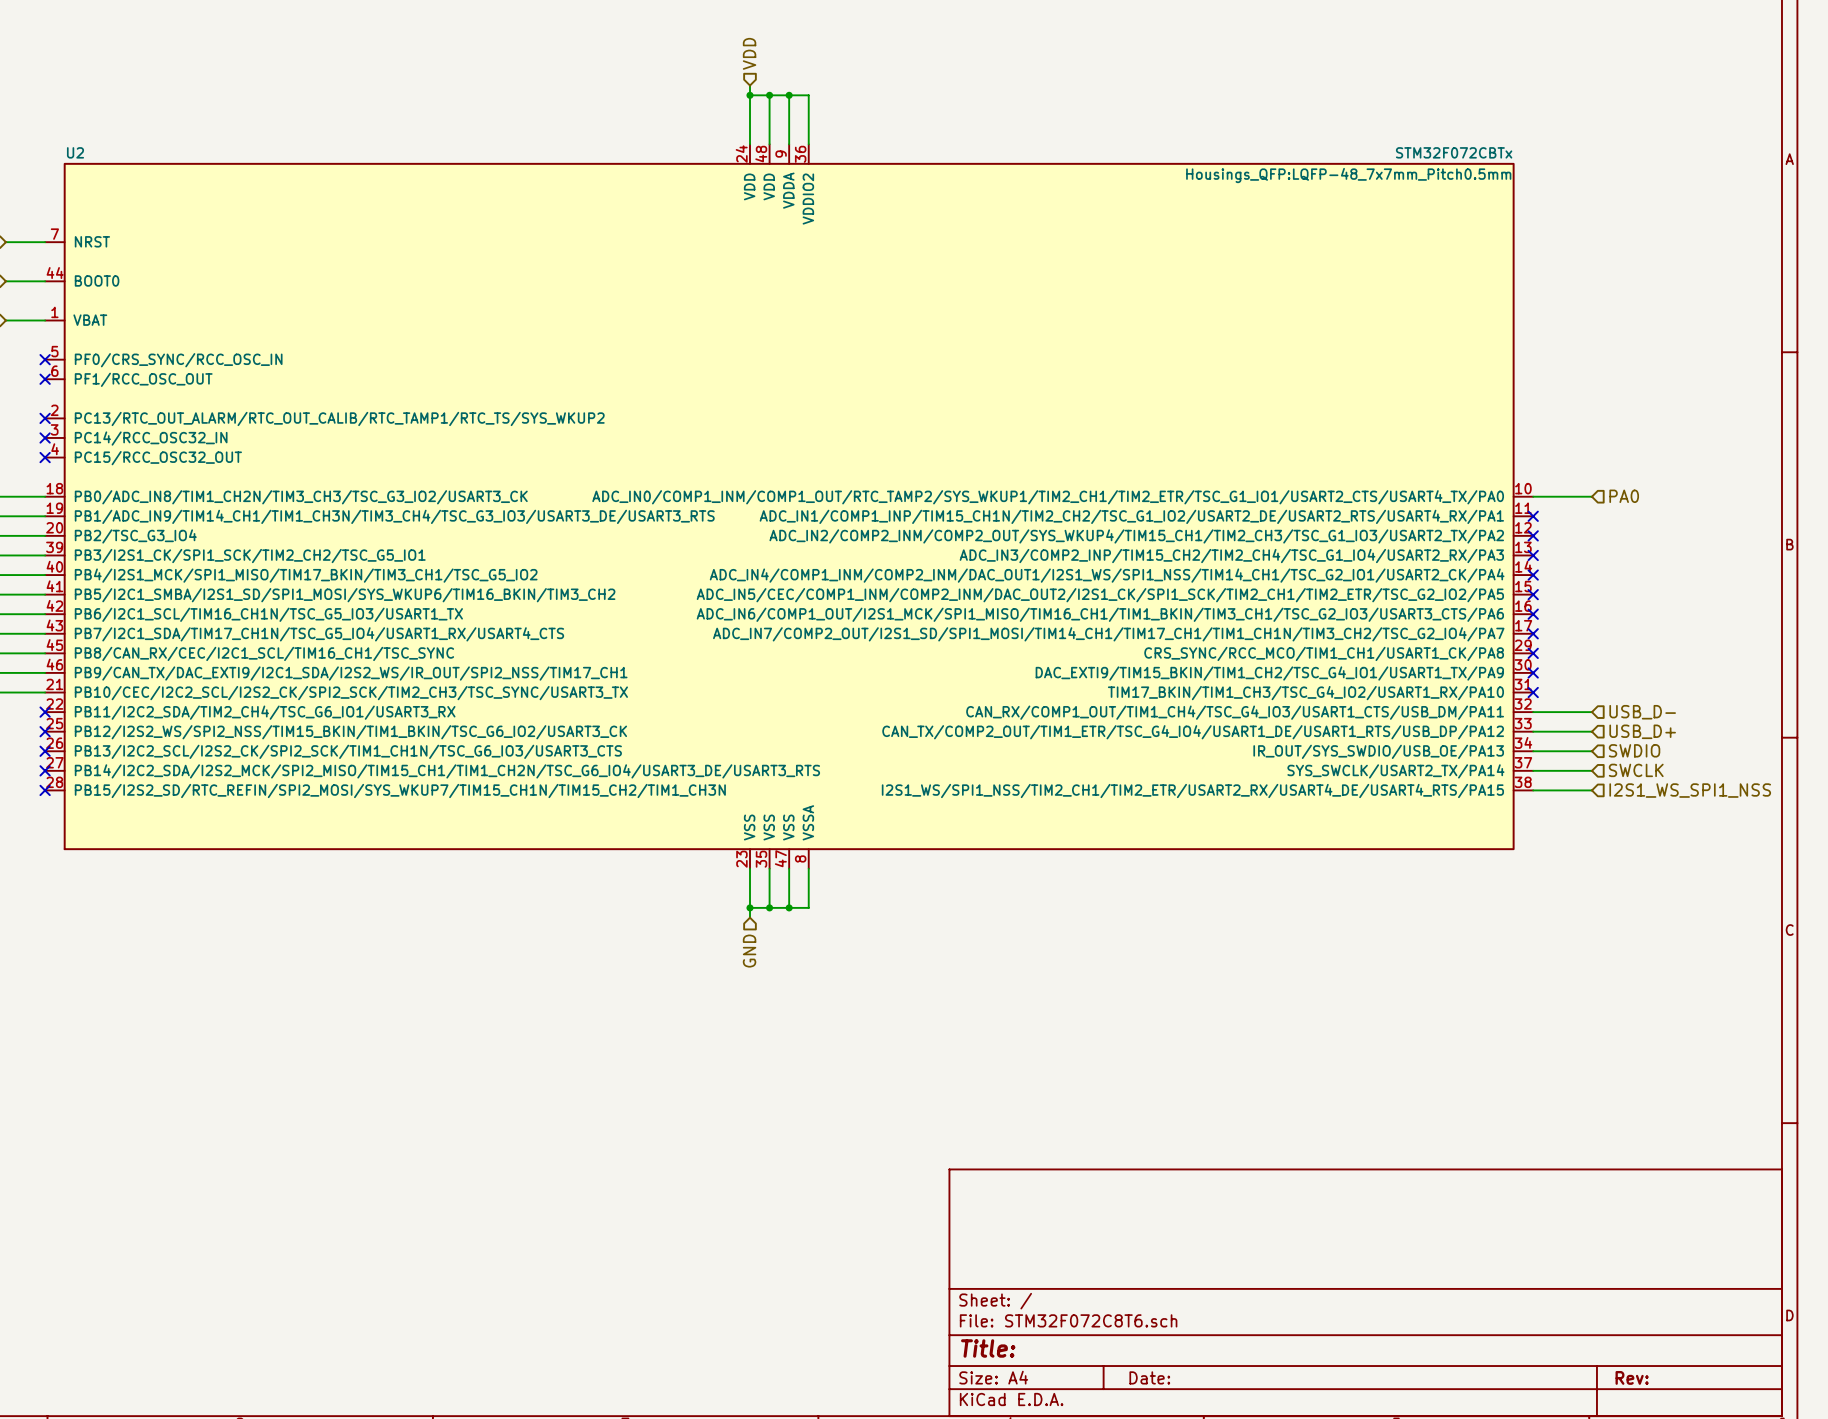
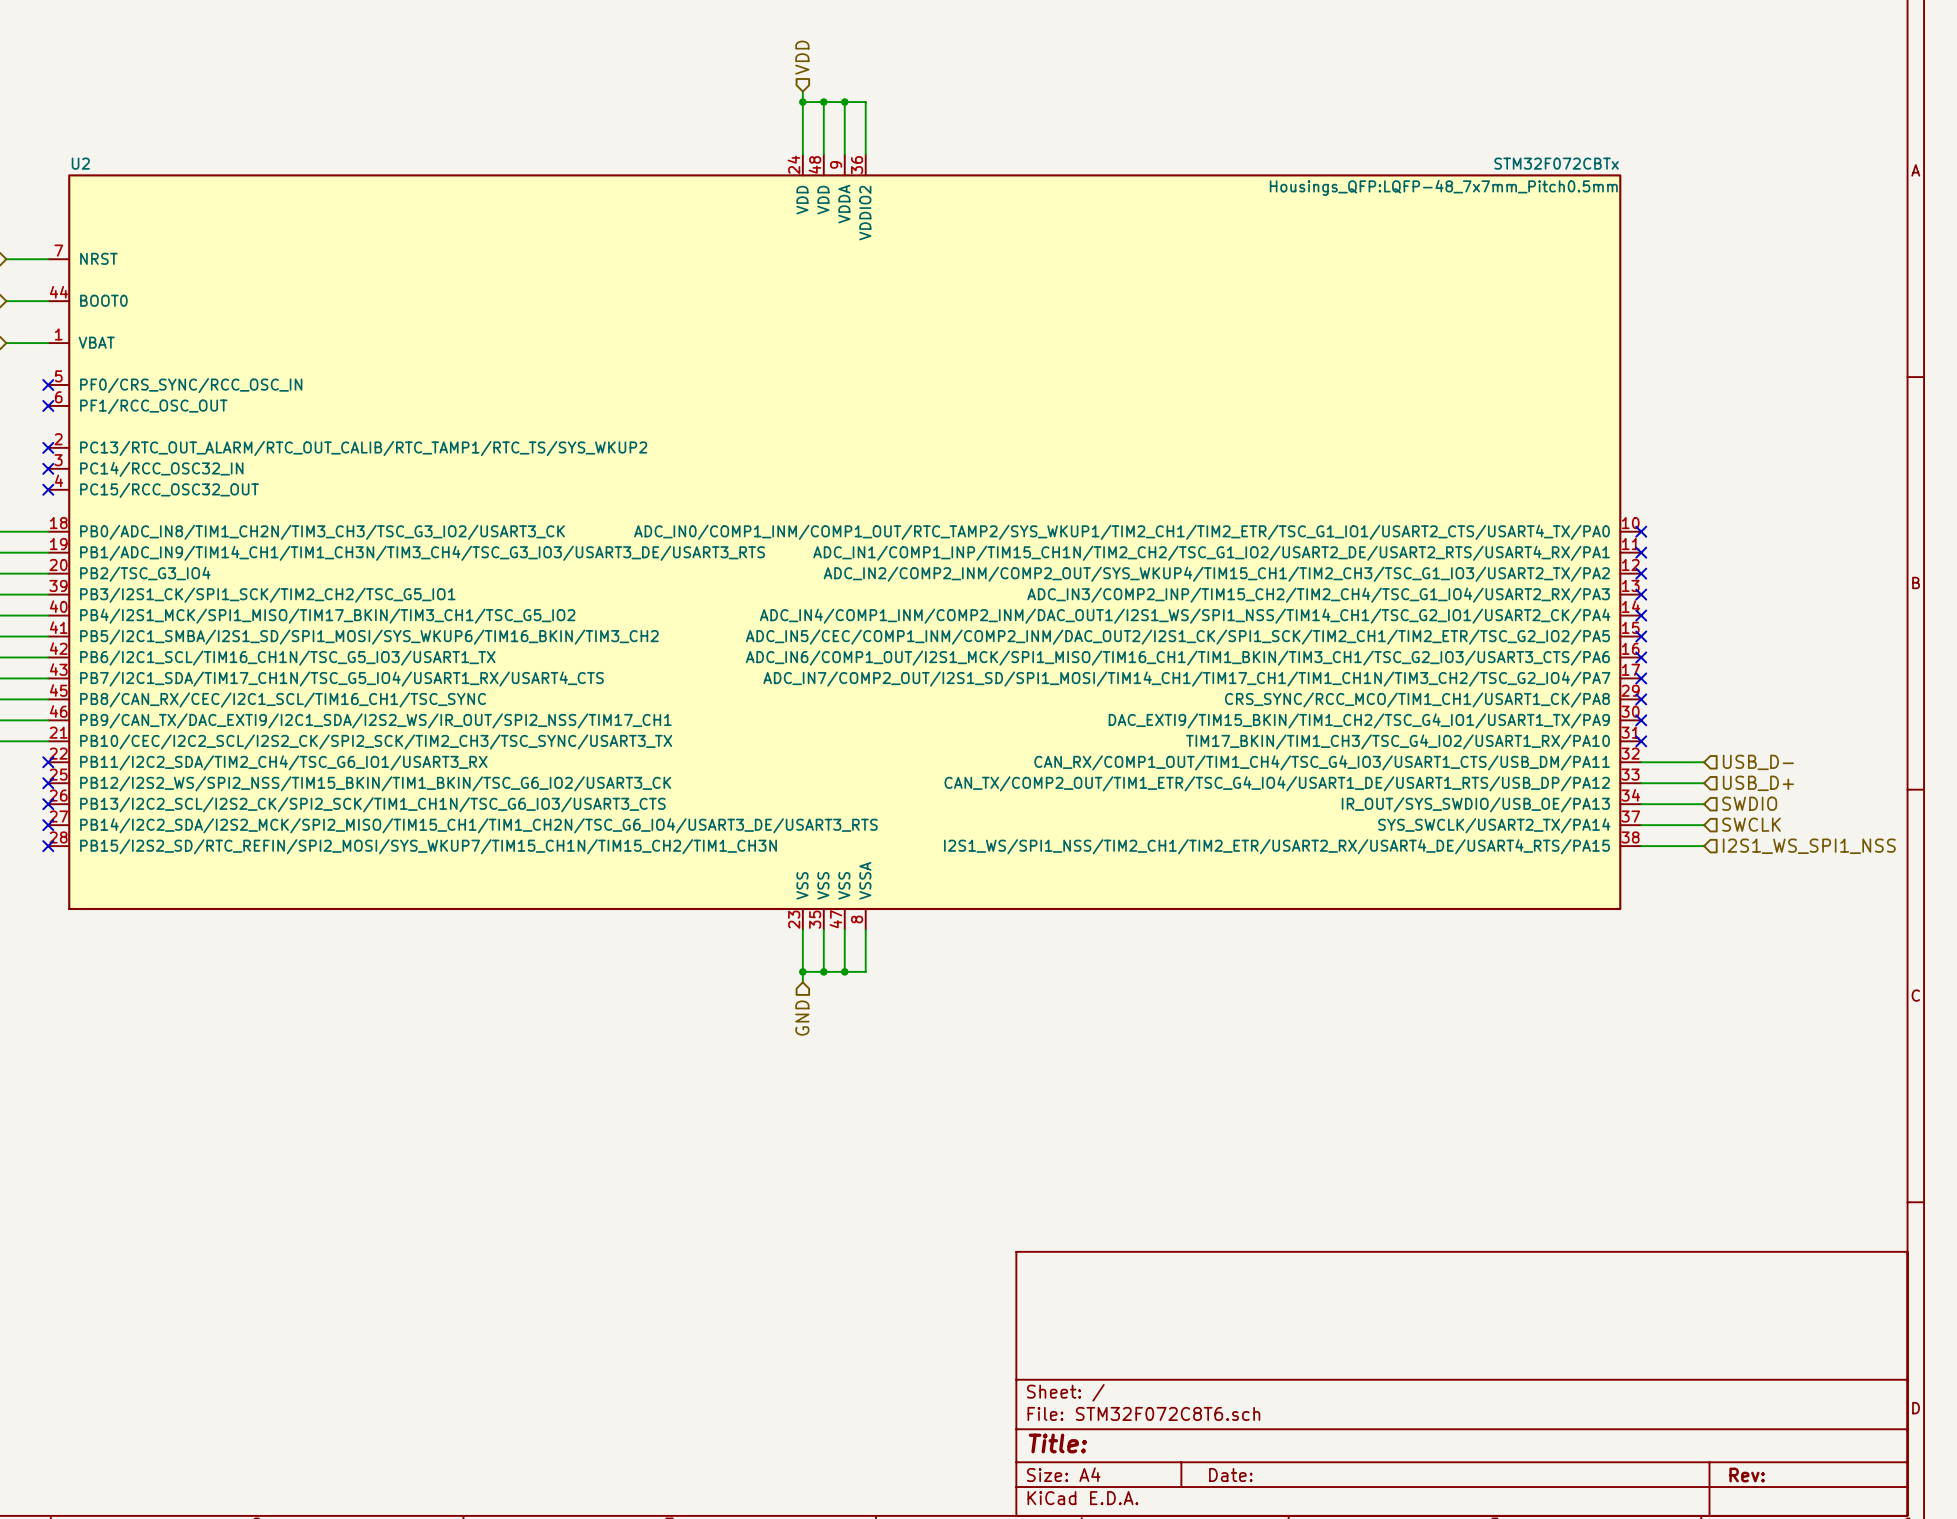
wire: (1533, 496) (1591, 496) -> none
no-connect mark: none -> (1641, 531)
hierarchical label: PA0 (1624, 496) -> none

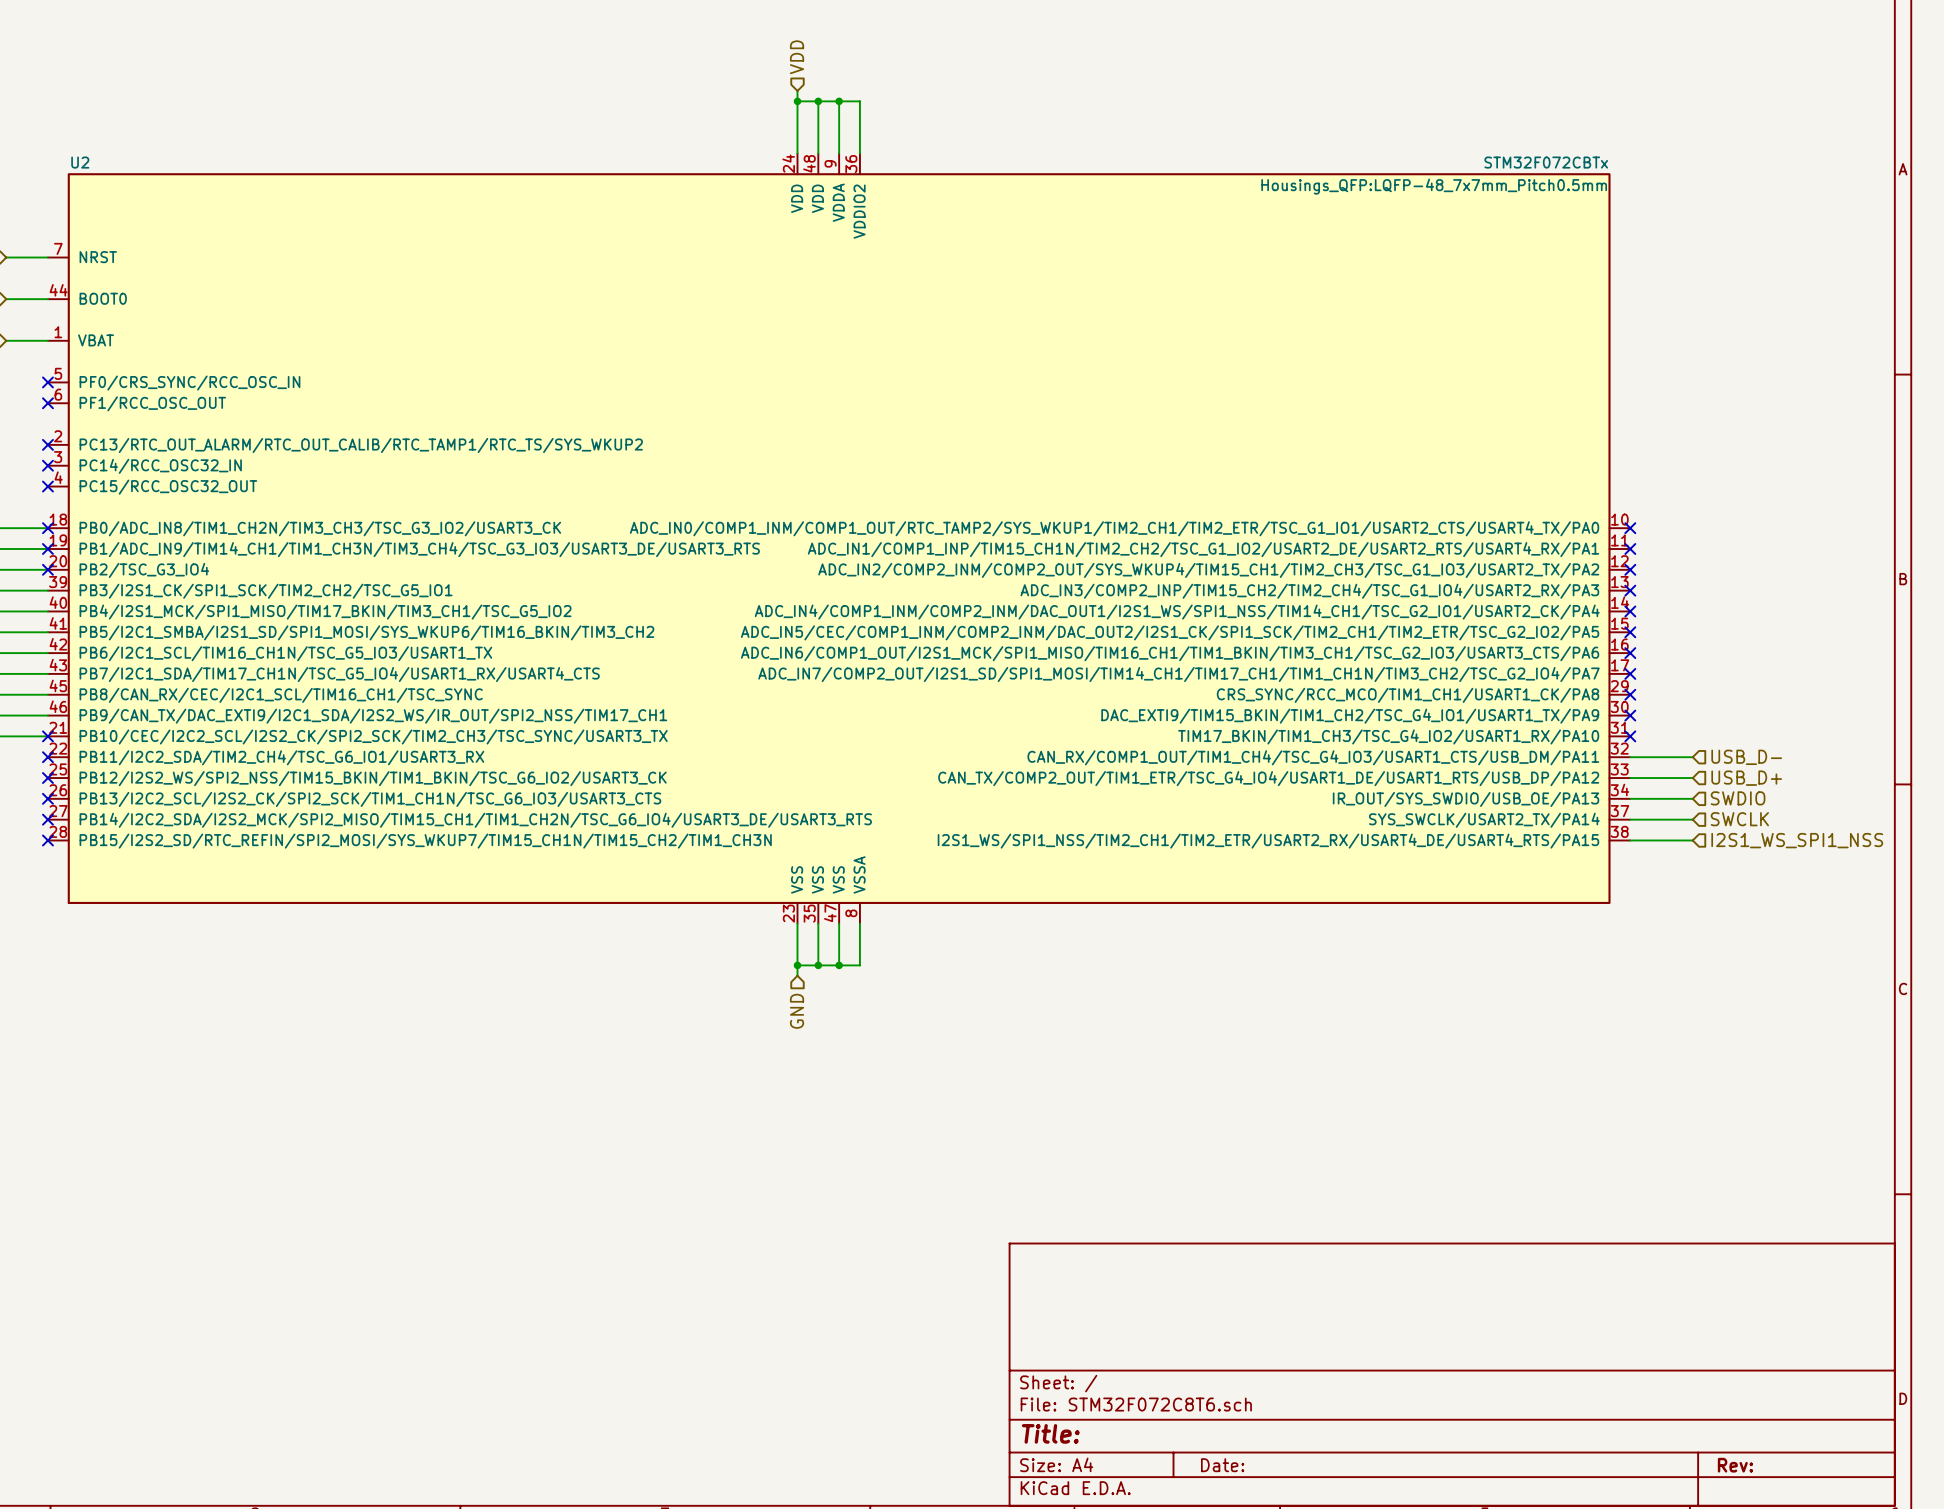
no-connect mark: none -> (47, 528)
no-connect mark: none -> (47, 549)
no-connect mark: none -> (47, 569)
no-connect mark: none -> (47, 736)

